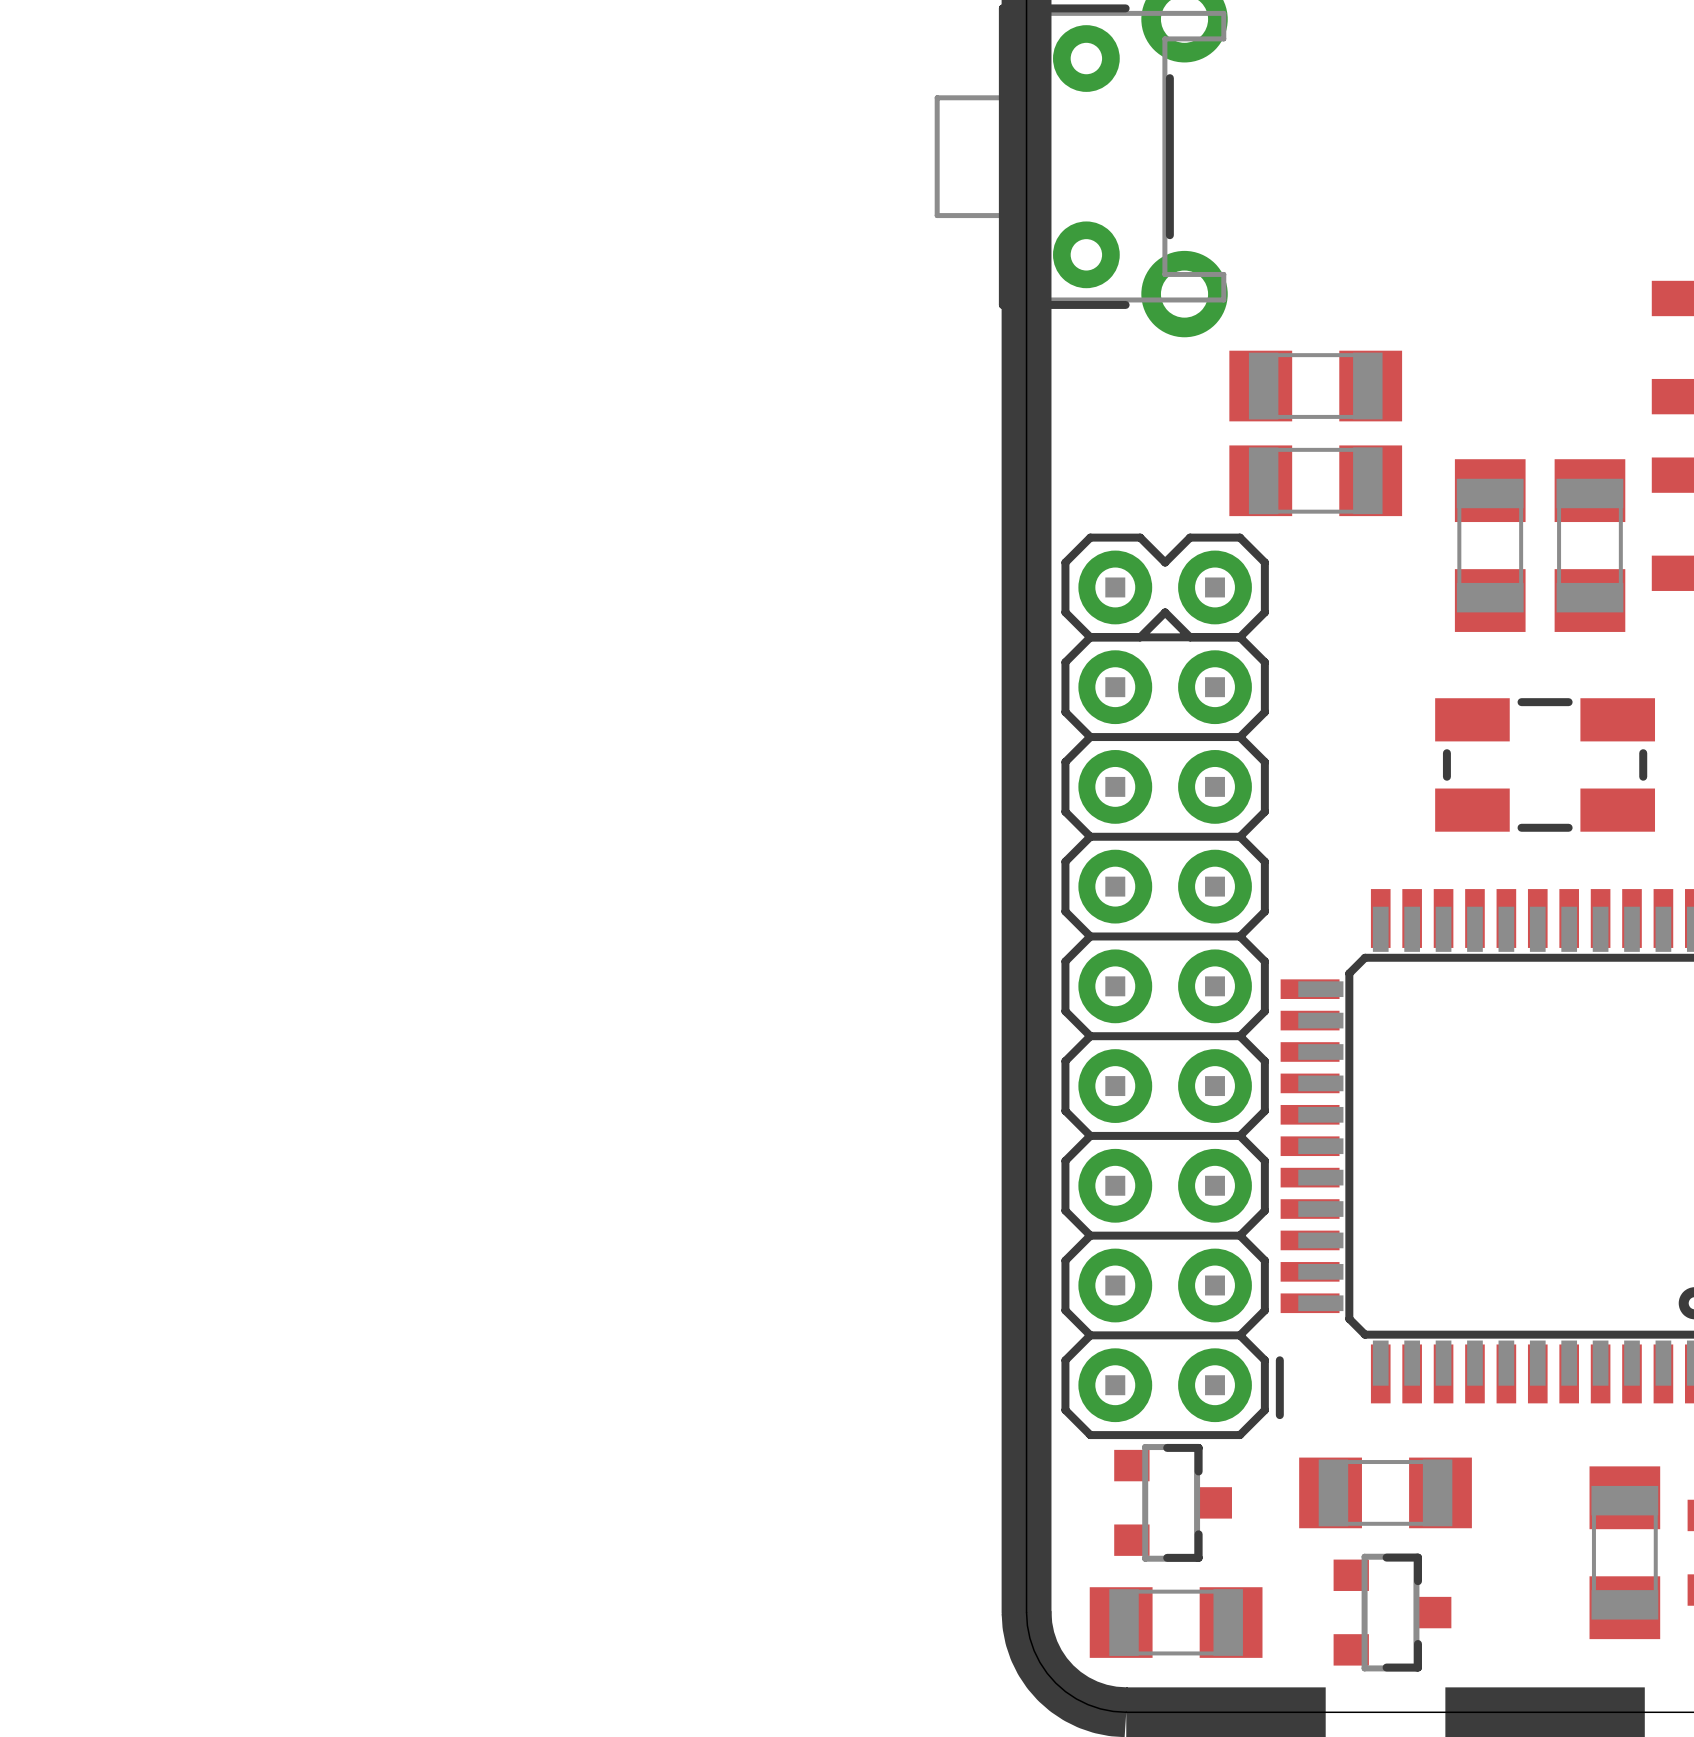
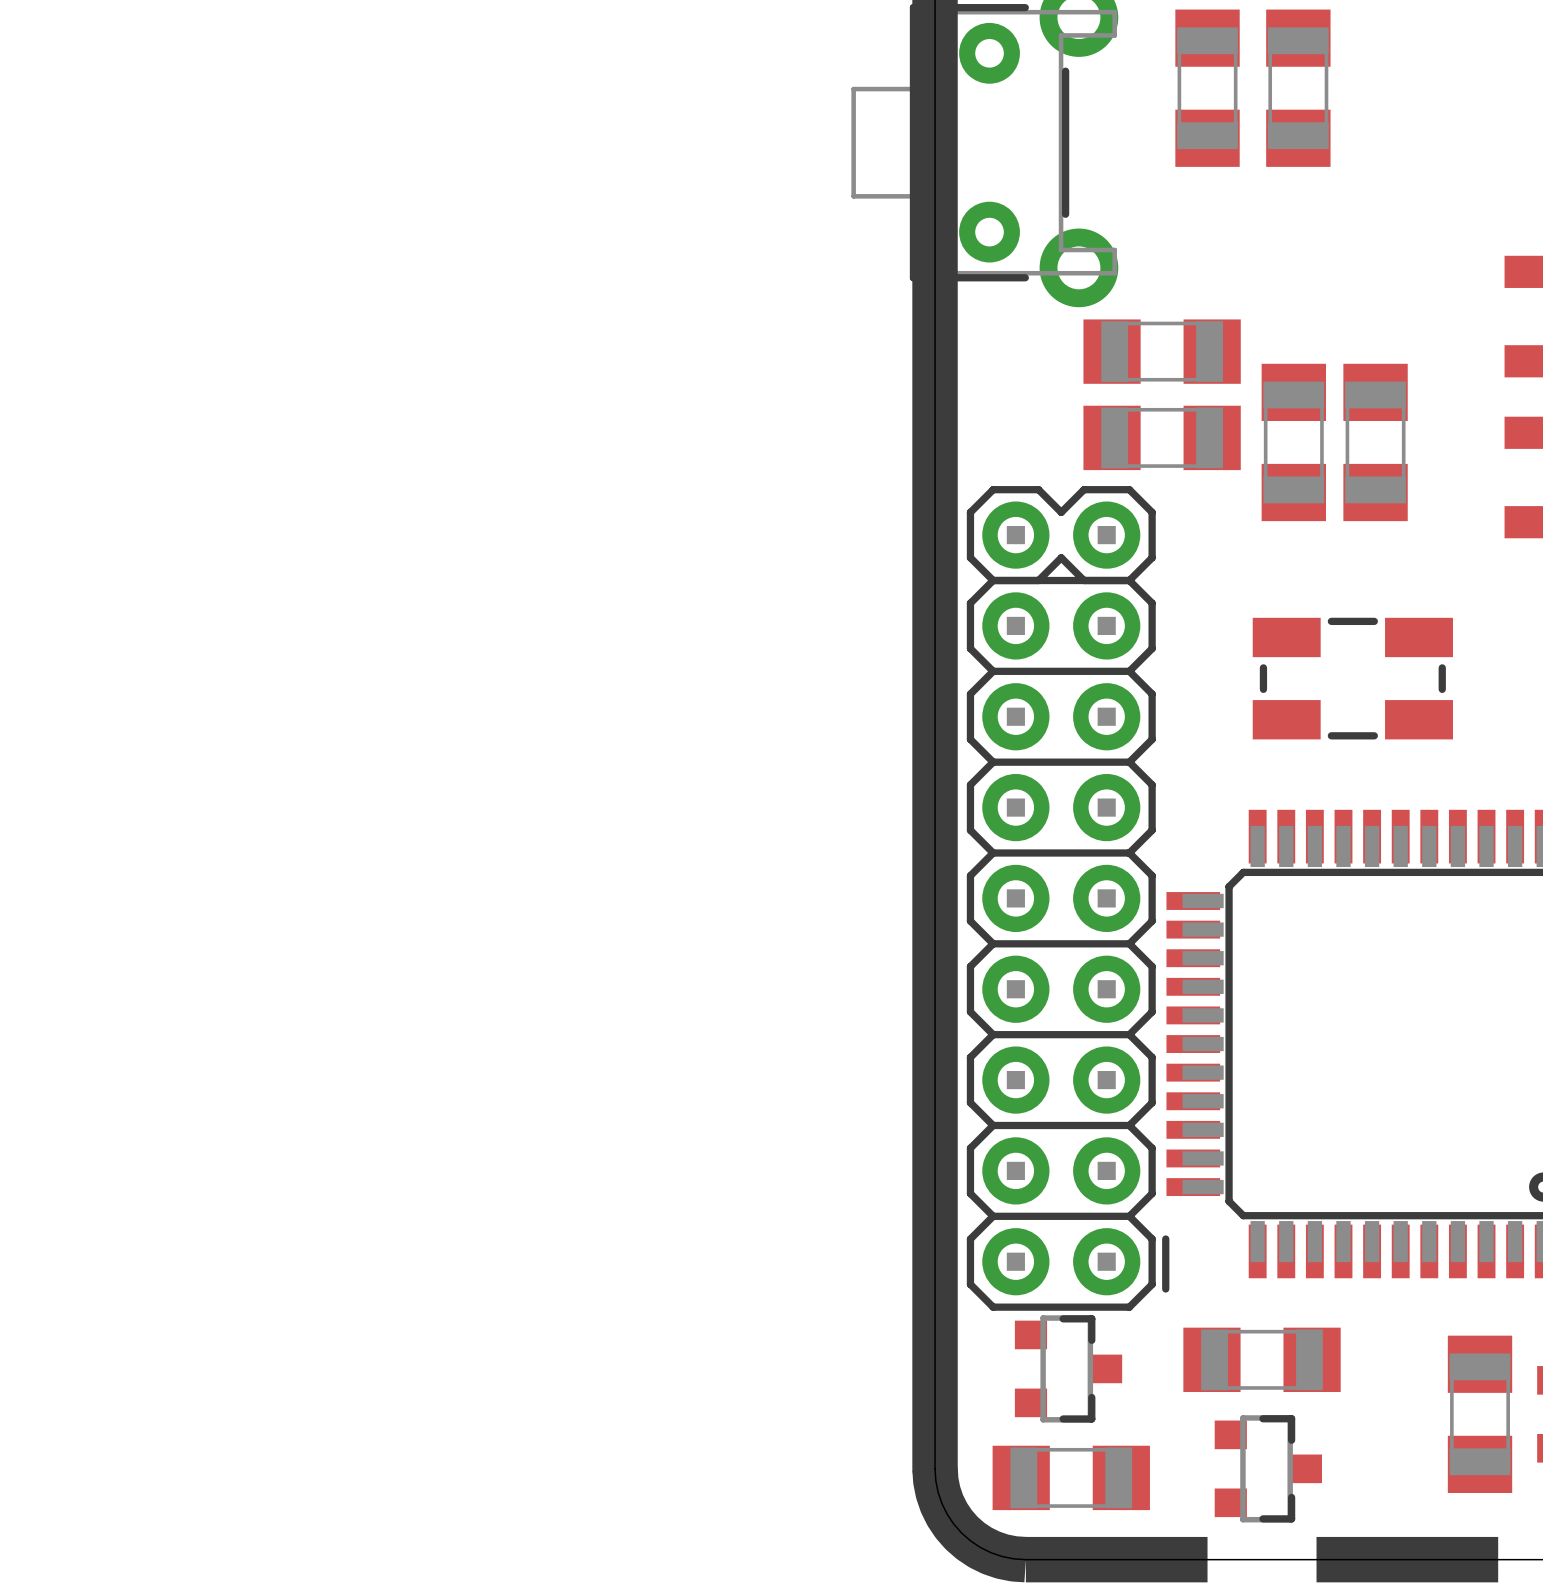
part: none -> (1207, 88)
part: none -> (1298, 88)
part position: (1315, 386) -> (1162, 351)
part position: (1315, 480) -> (1162, 437)
part: none -> (1293, 442)
part: none -> (1375, 442)
part: (1490, 545) -> none
part: (1589, 545) -> none
part position: (1545, 764) -> (1352, 678)

